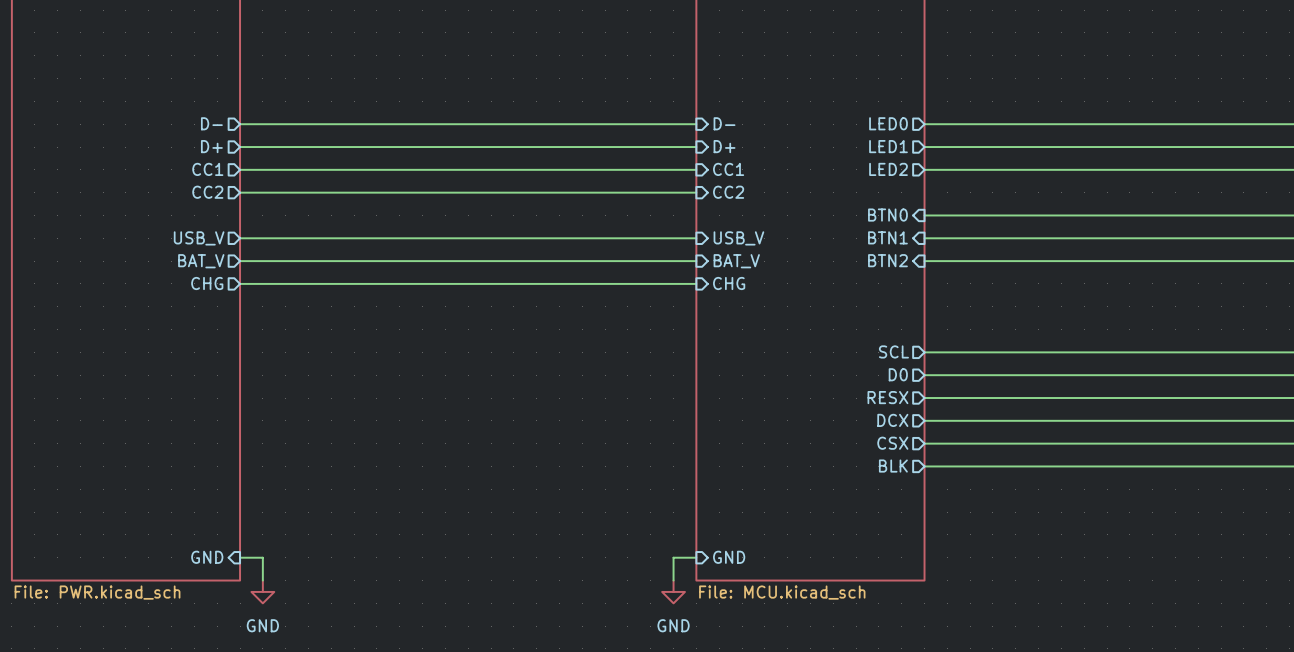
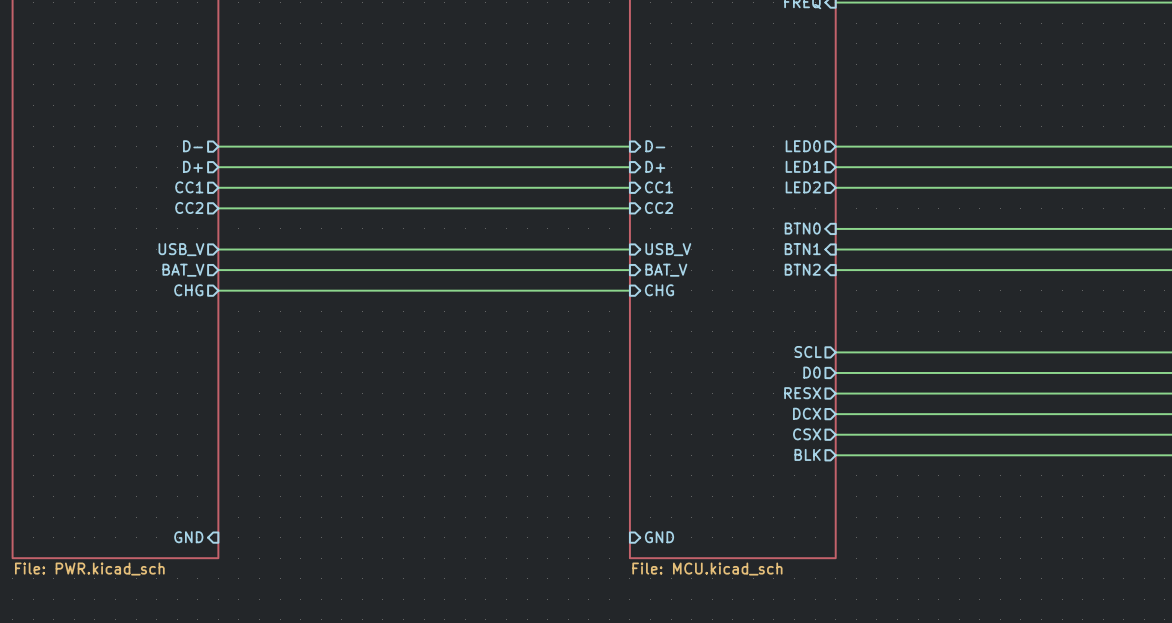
wire: (240, 557) (262, 557) (262, 580) -> none
wire: (696, 557) (673, 557) (673, 580) -> none
power symbol: GND (262, 591) -> none
power symbol: GND (673, 591) -> none

